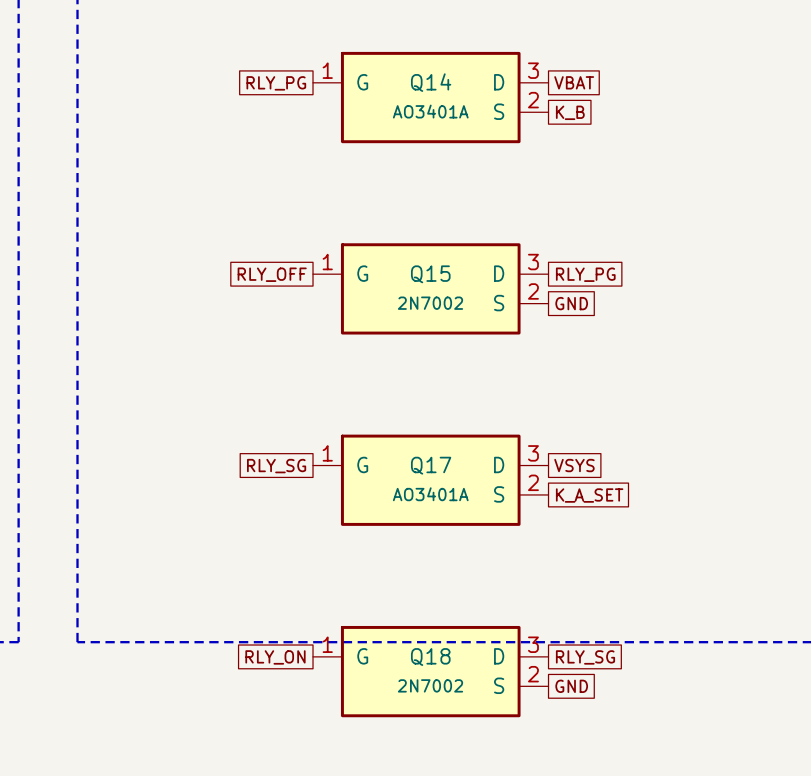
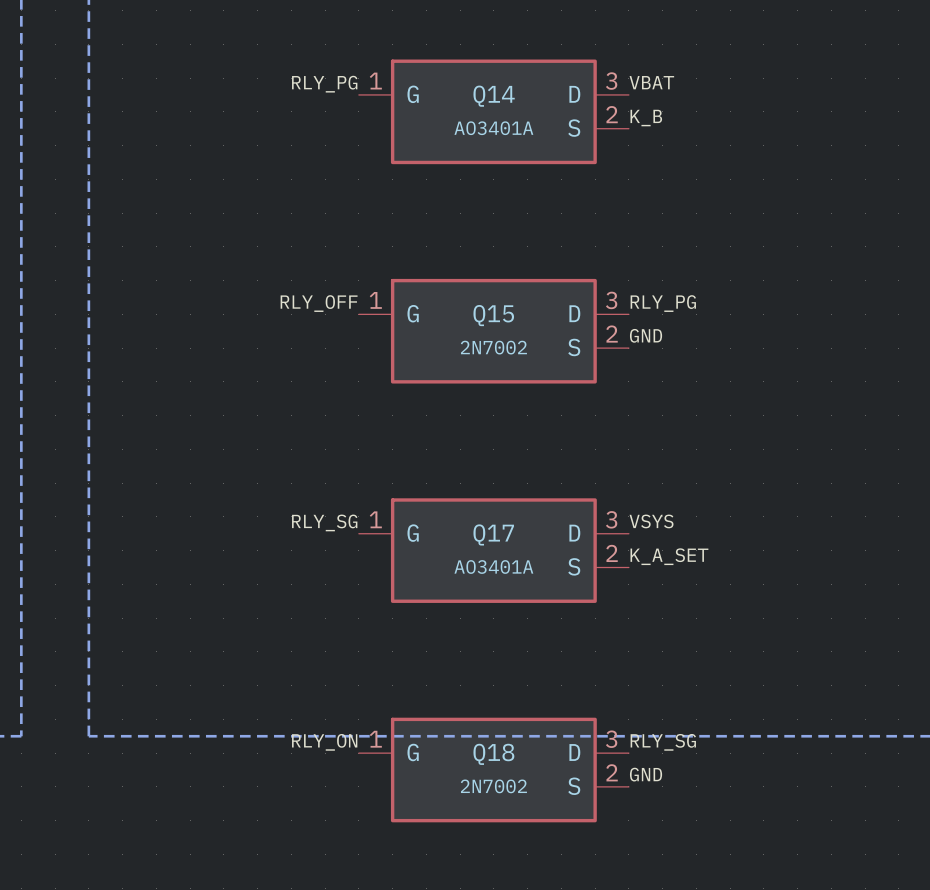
label: none -> RLY_PG (324, 84)
label: none -> VBAT (651, 82)
global label: VBAT (574, 82) -> none
global label: RLY_PG (276, 83) -> none
label: none -> K_B (646, 118)
global label: K_B (570, 112) -> none
label: none -> RLY_OFF (319, 303)
label: none -> RLY_PG (663, 303)
global label: RLY_OFF (272, 274) -> none
global label: RLY_PG (585, 274) -> none
label: none -> GND (646, 335)
global label: GND (571, 303) -> none
label: none -> VSYS (651, 521)
label: none -> RLY_SG (324, 522)
global label: VSYS (574, 465) -> none
global label: RLY_SG (276, 466) -> none
label: none -> K_A_SET (669, 556)
global label: K_A_SET (589, 495) -> none
label: none -> RLY_ON (324, 742)
label: none -> RLY_SG (663, 742)
global label: RLY_ON (275, 657) -> none
global label: RLY_SG (585, 657) -> none
label: none -> GND (646, 774)
global label: GND (571, 686) -> none

